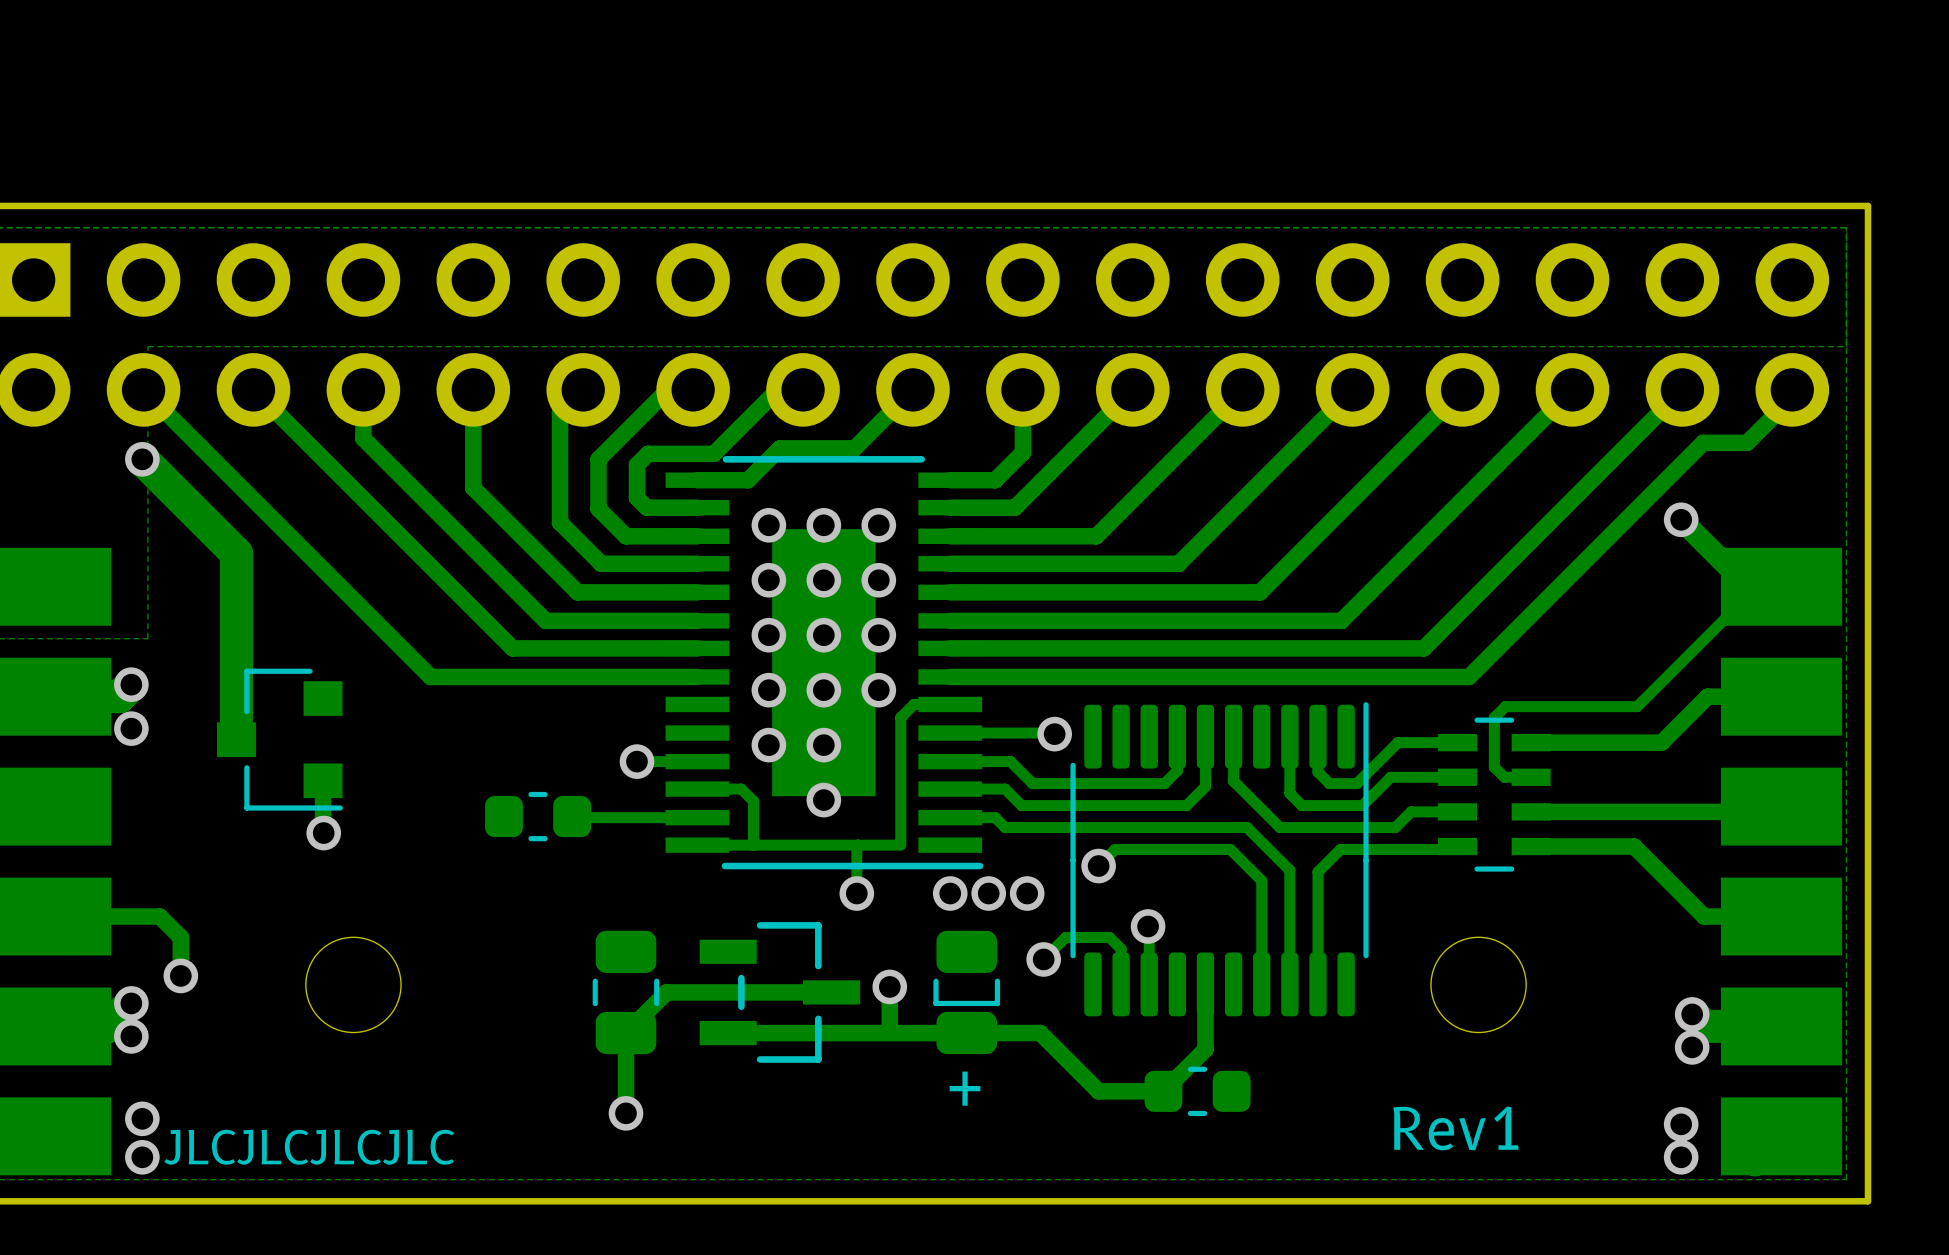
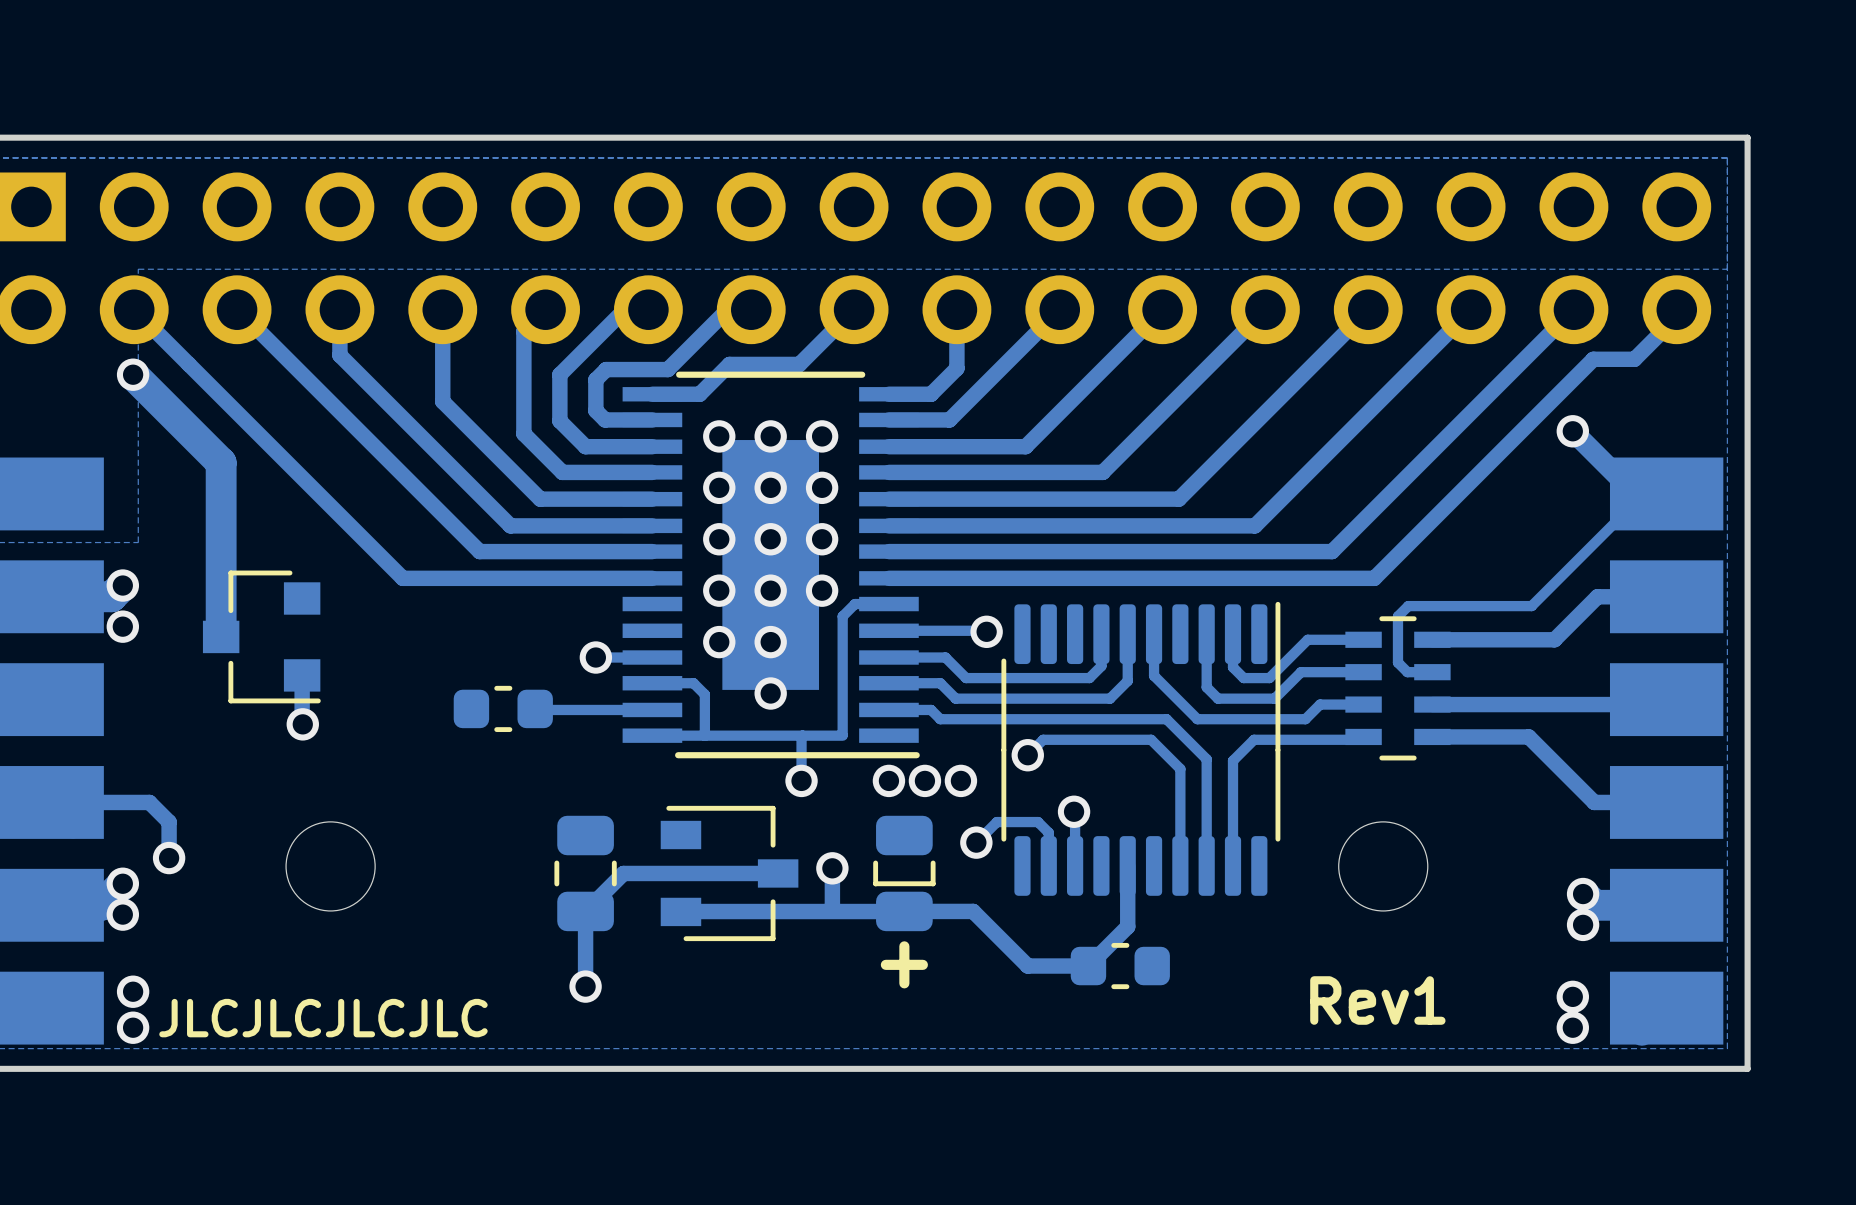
part footprint: [699, 922, 861, 1063] -> [660, 805, 799, 942]

